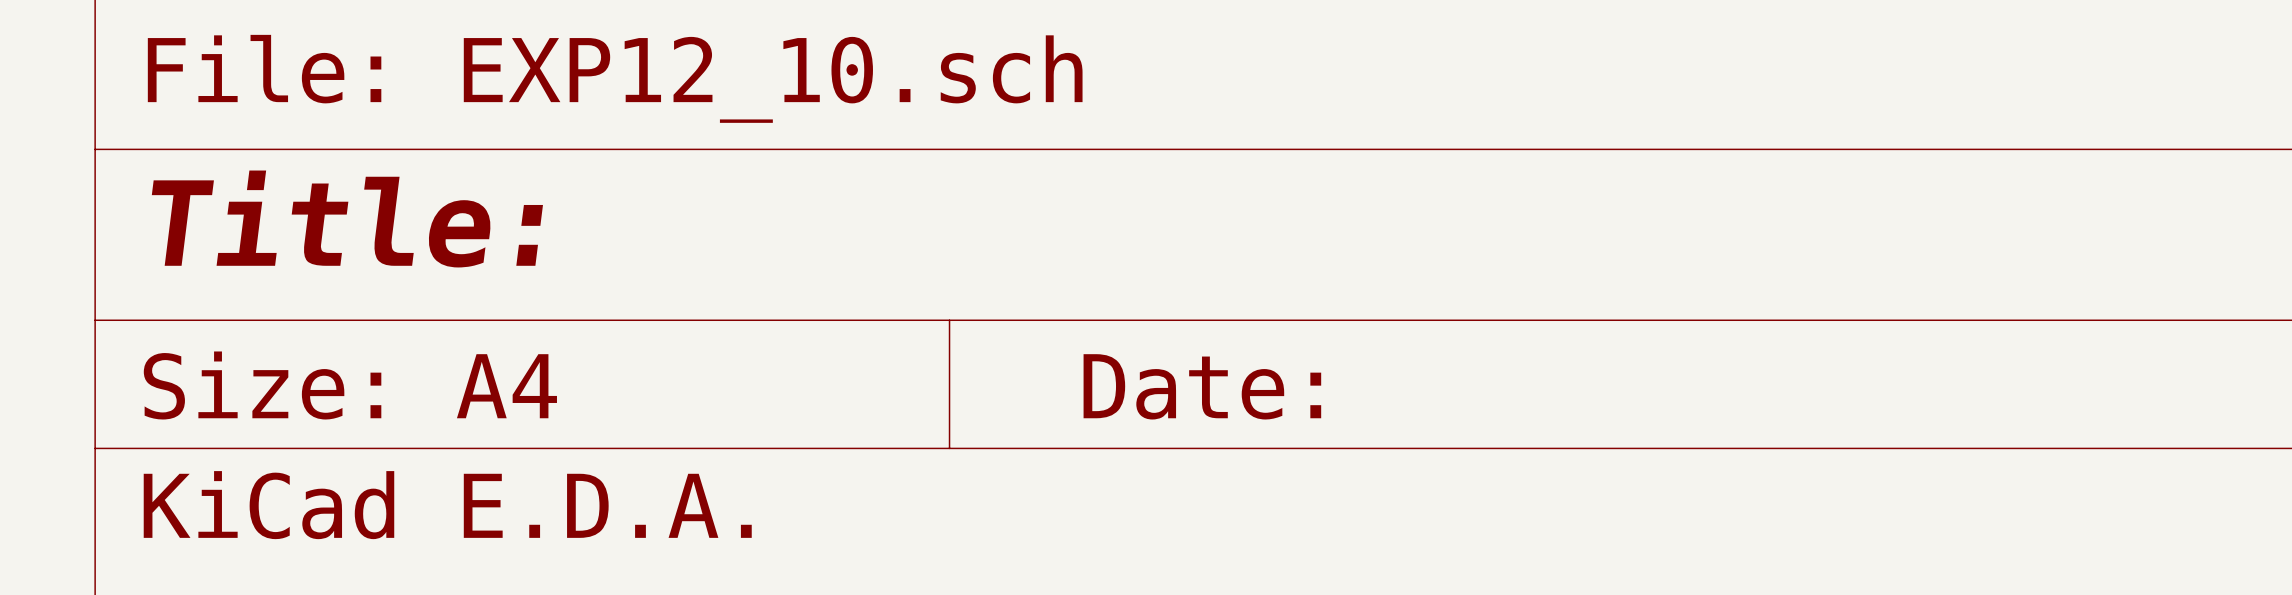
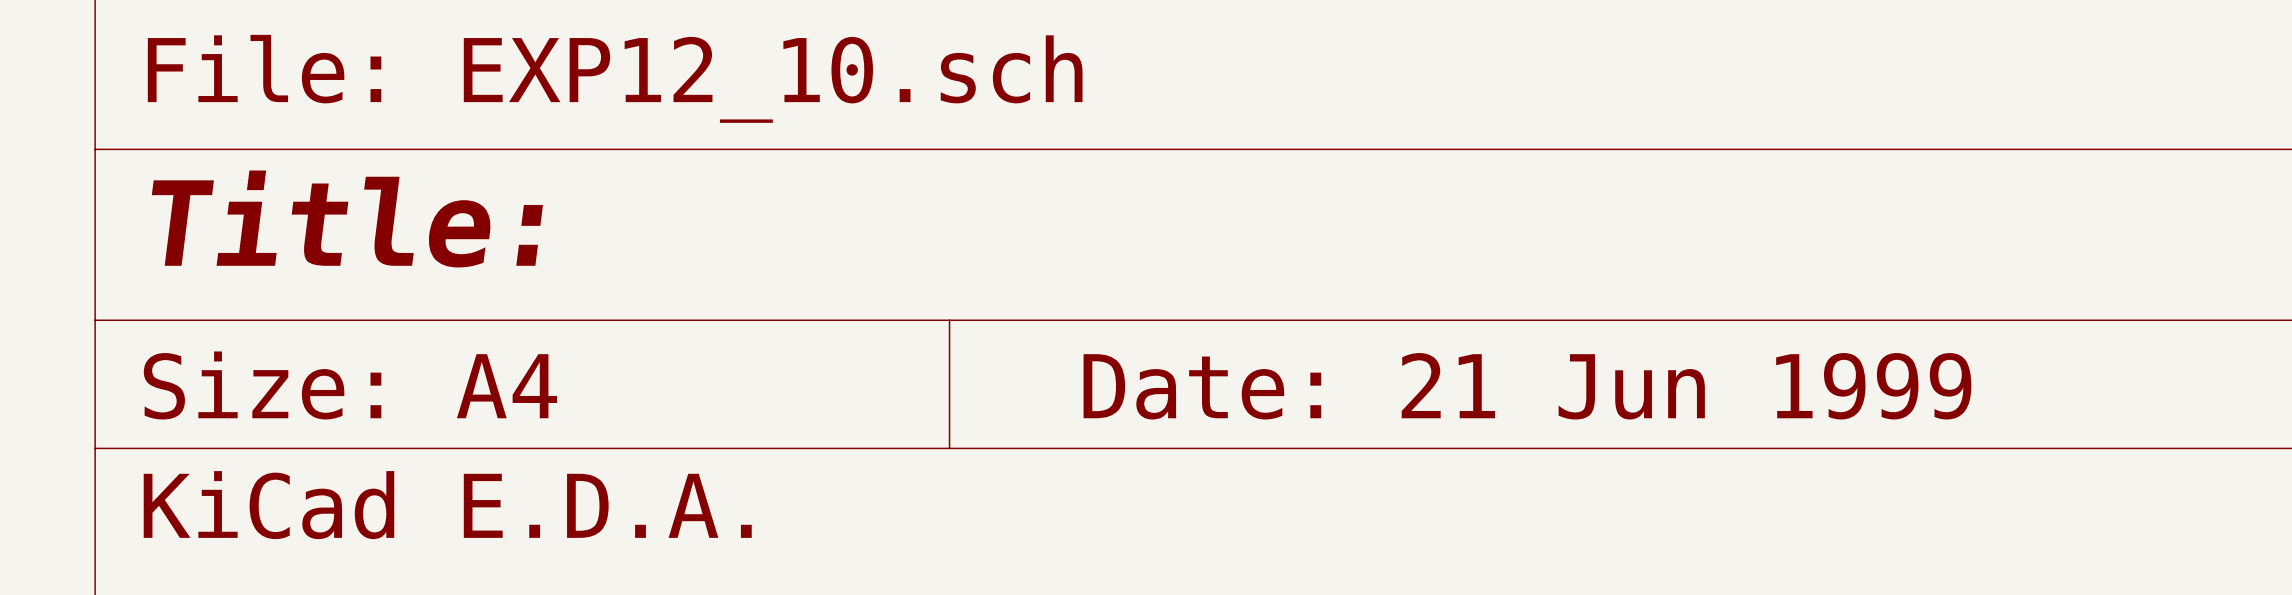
title block: Date: (1202, 386) -> Date: 21 Jun 1999 (1527, 386)

